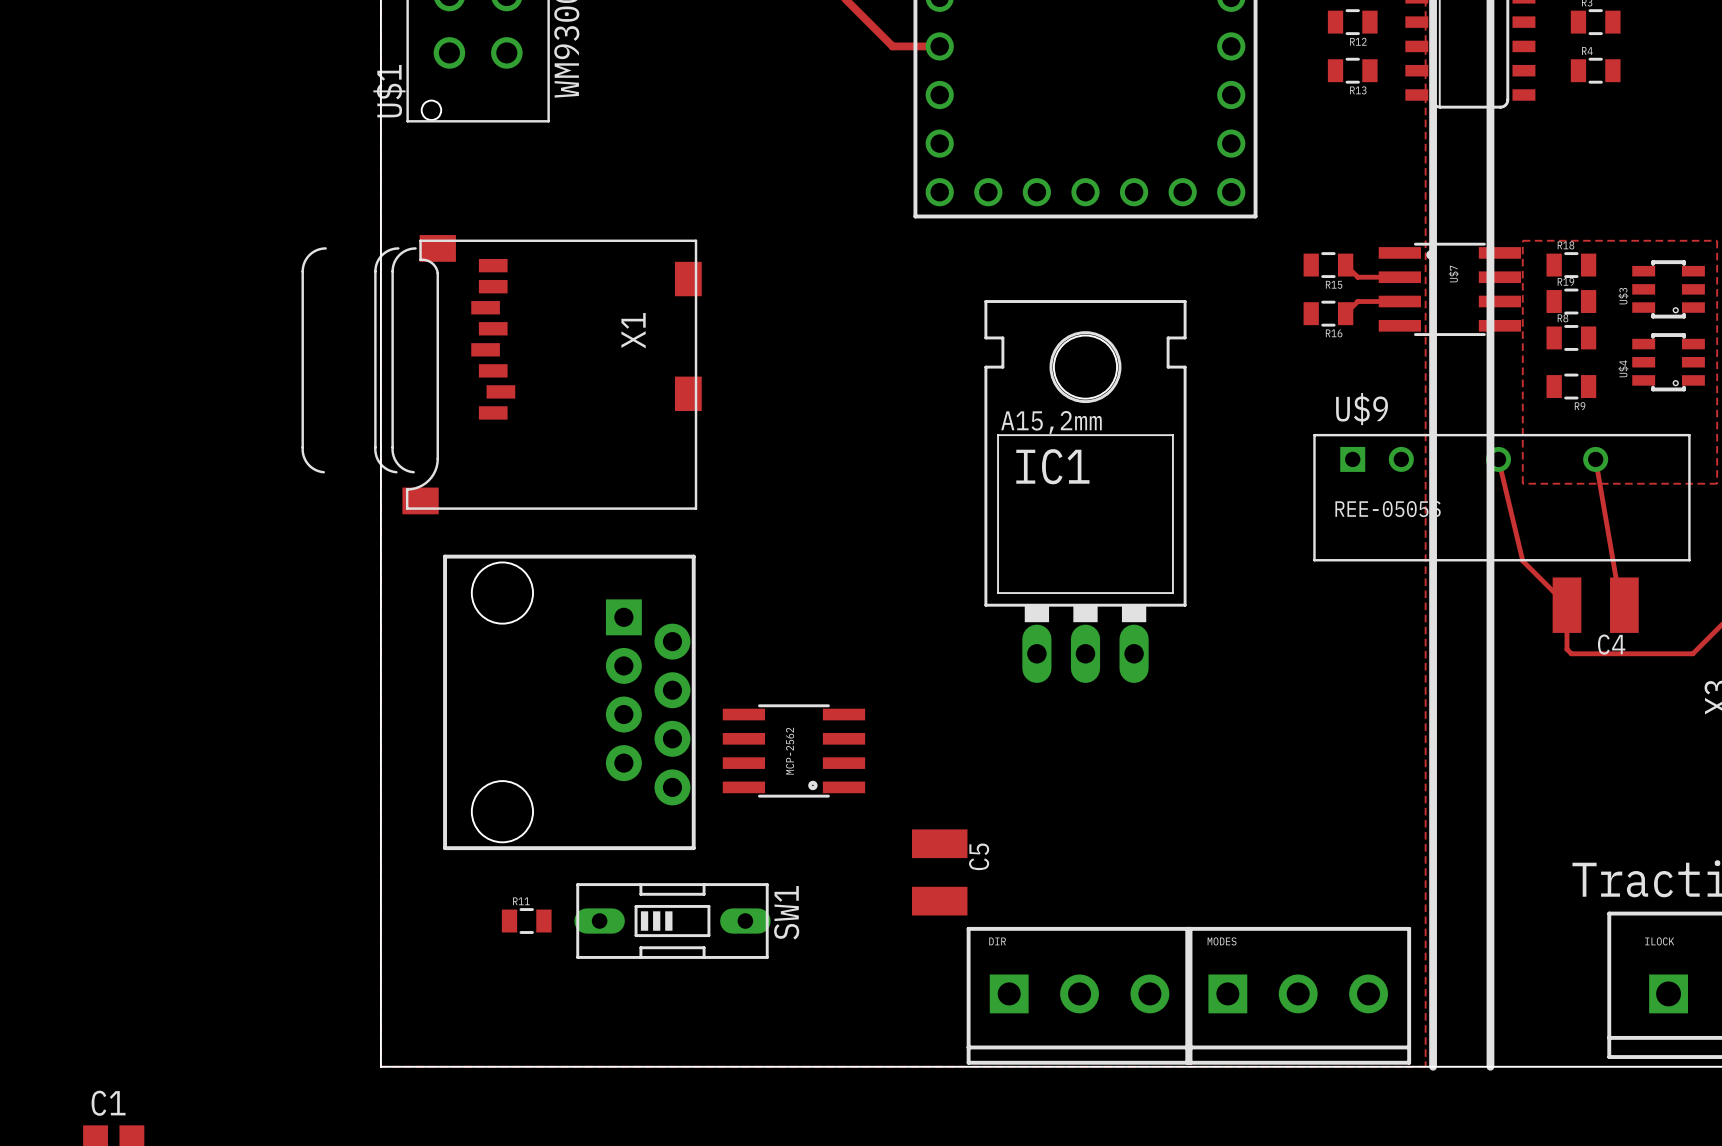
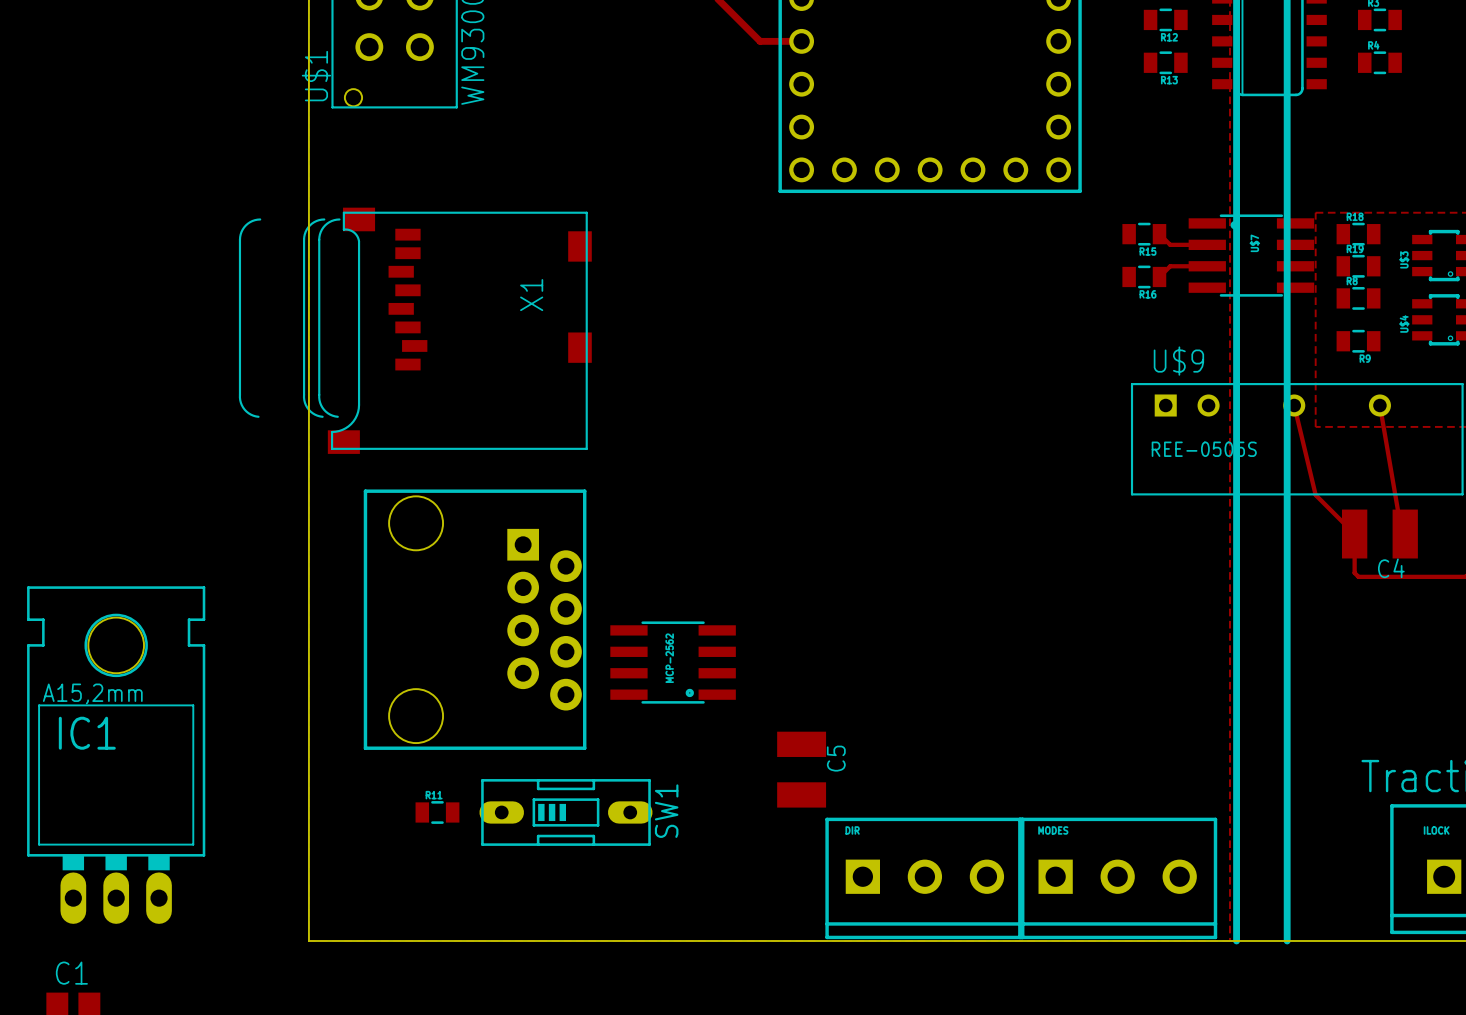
IC1 position: (1085, 491) -> (116, 755)

